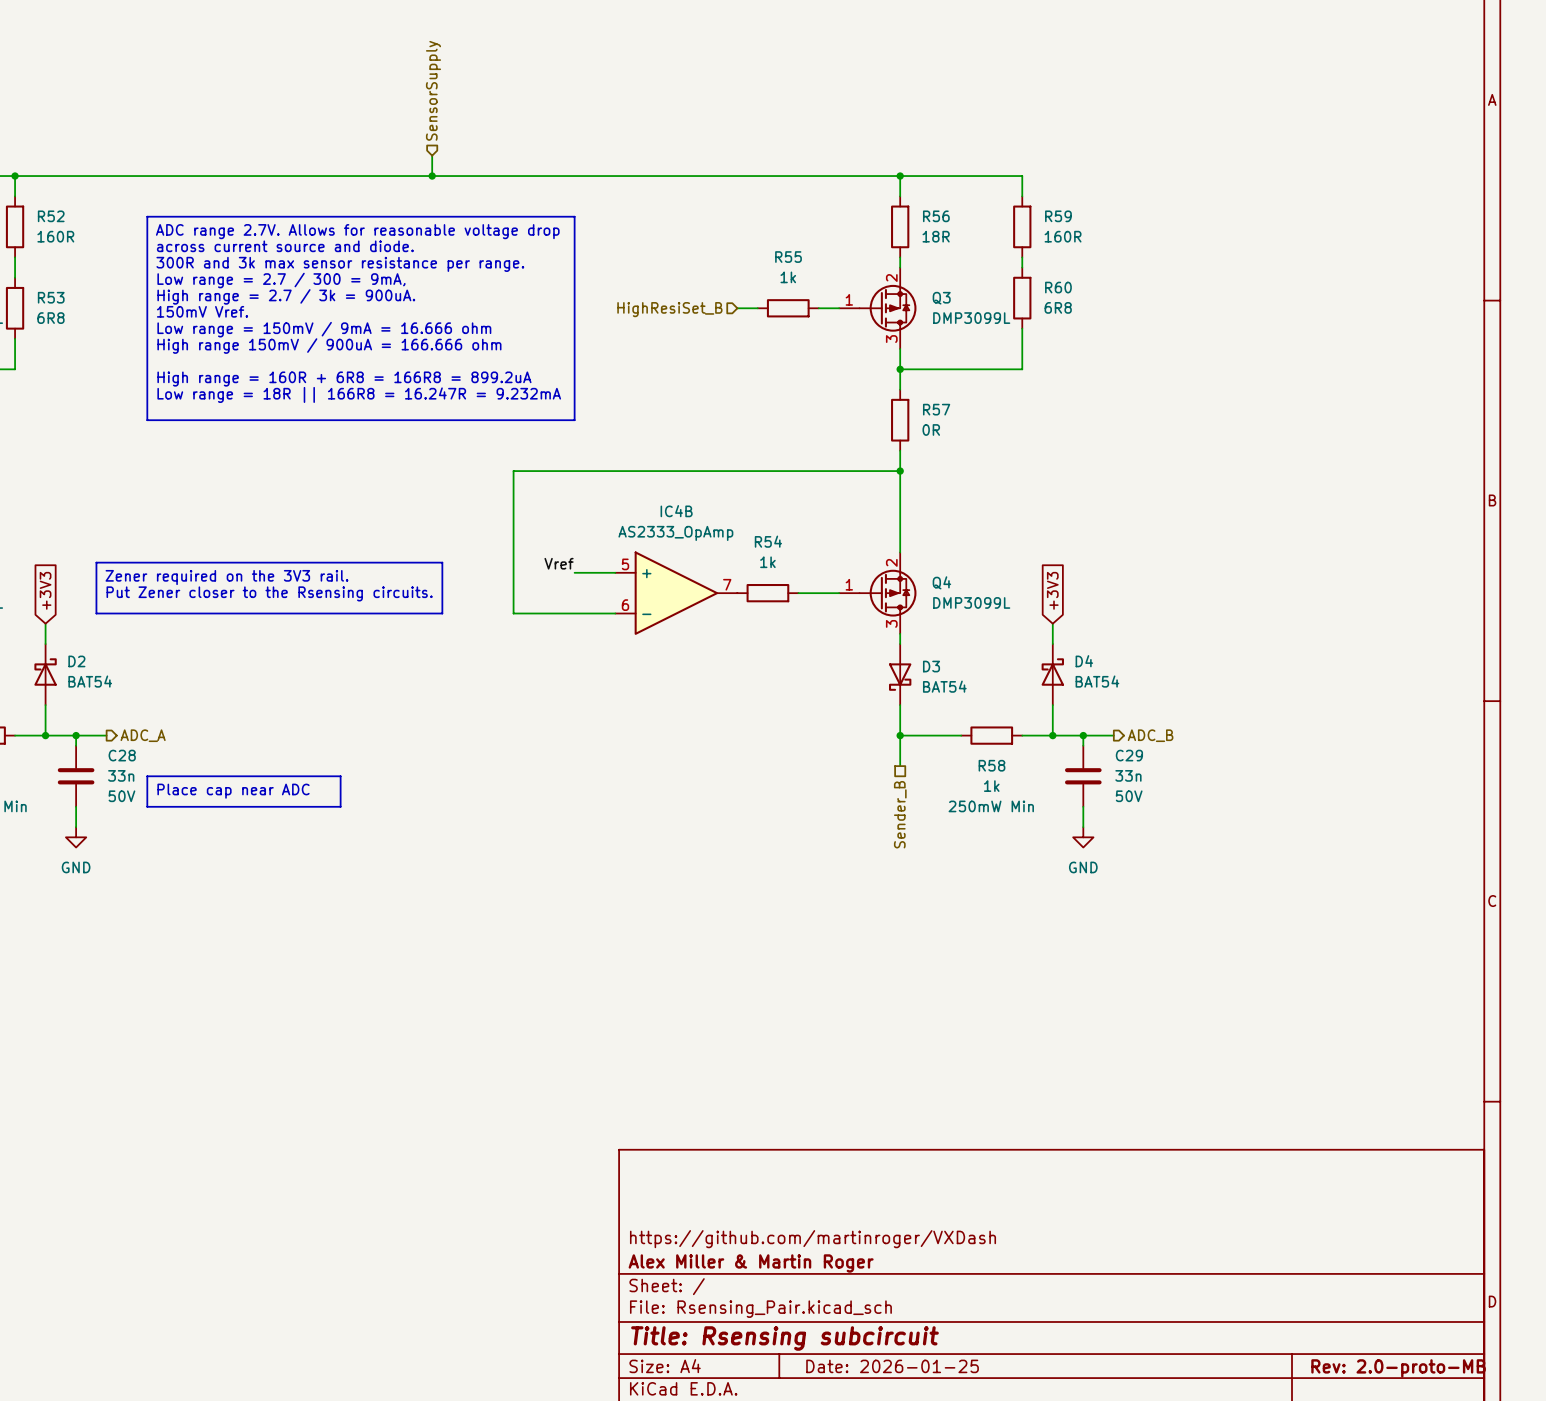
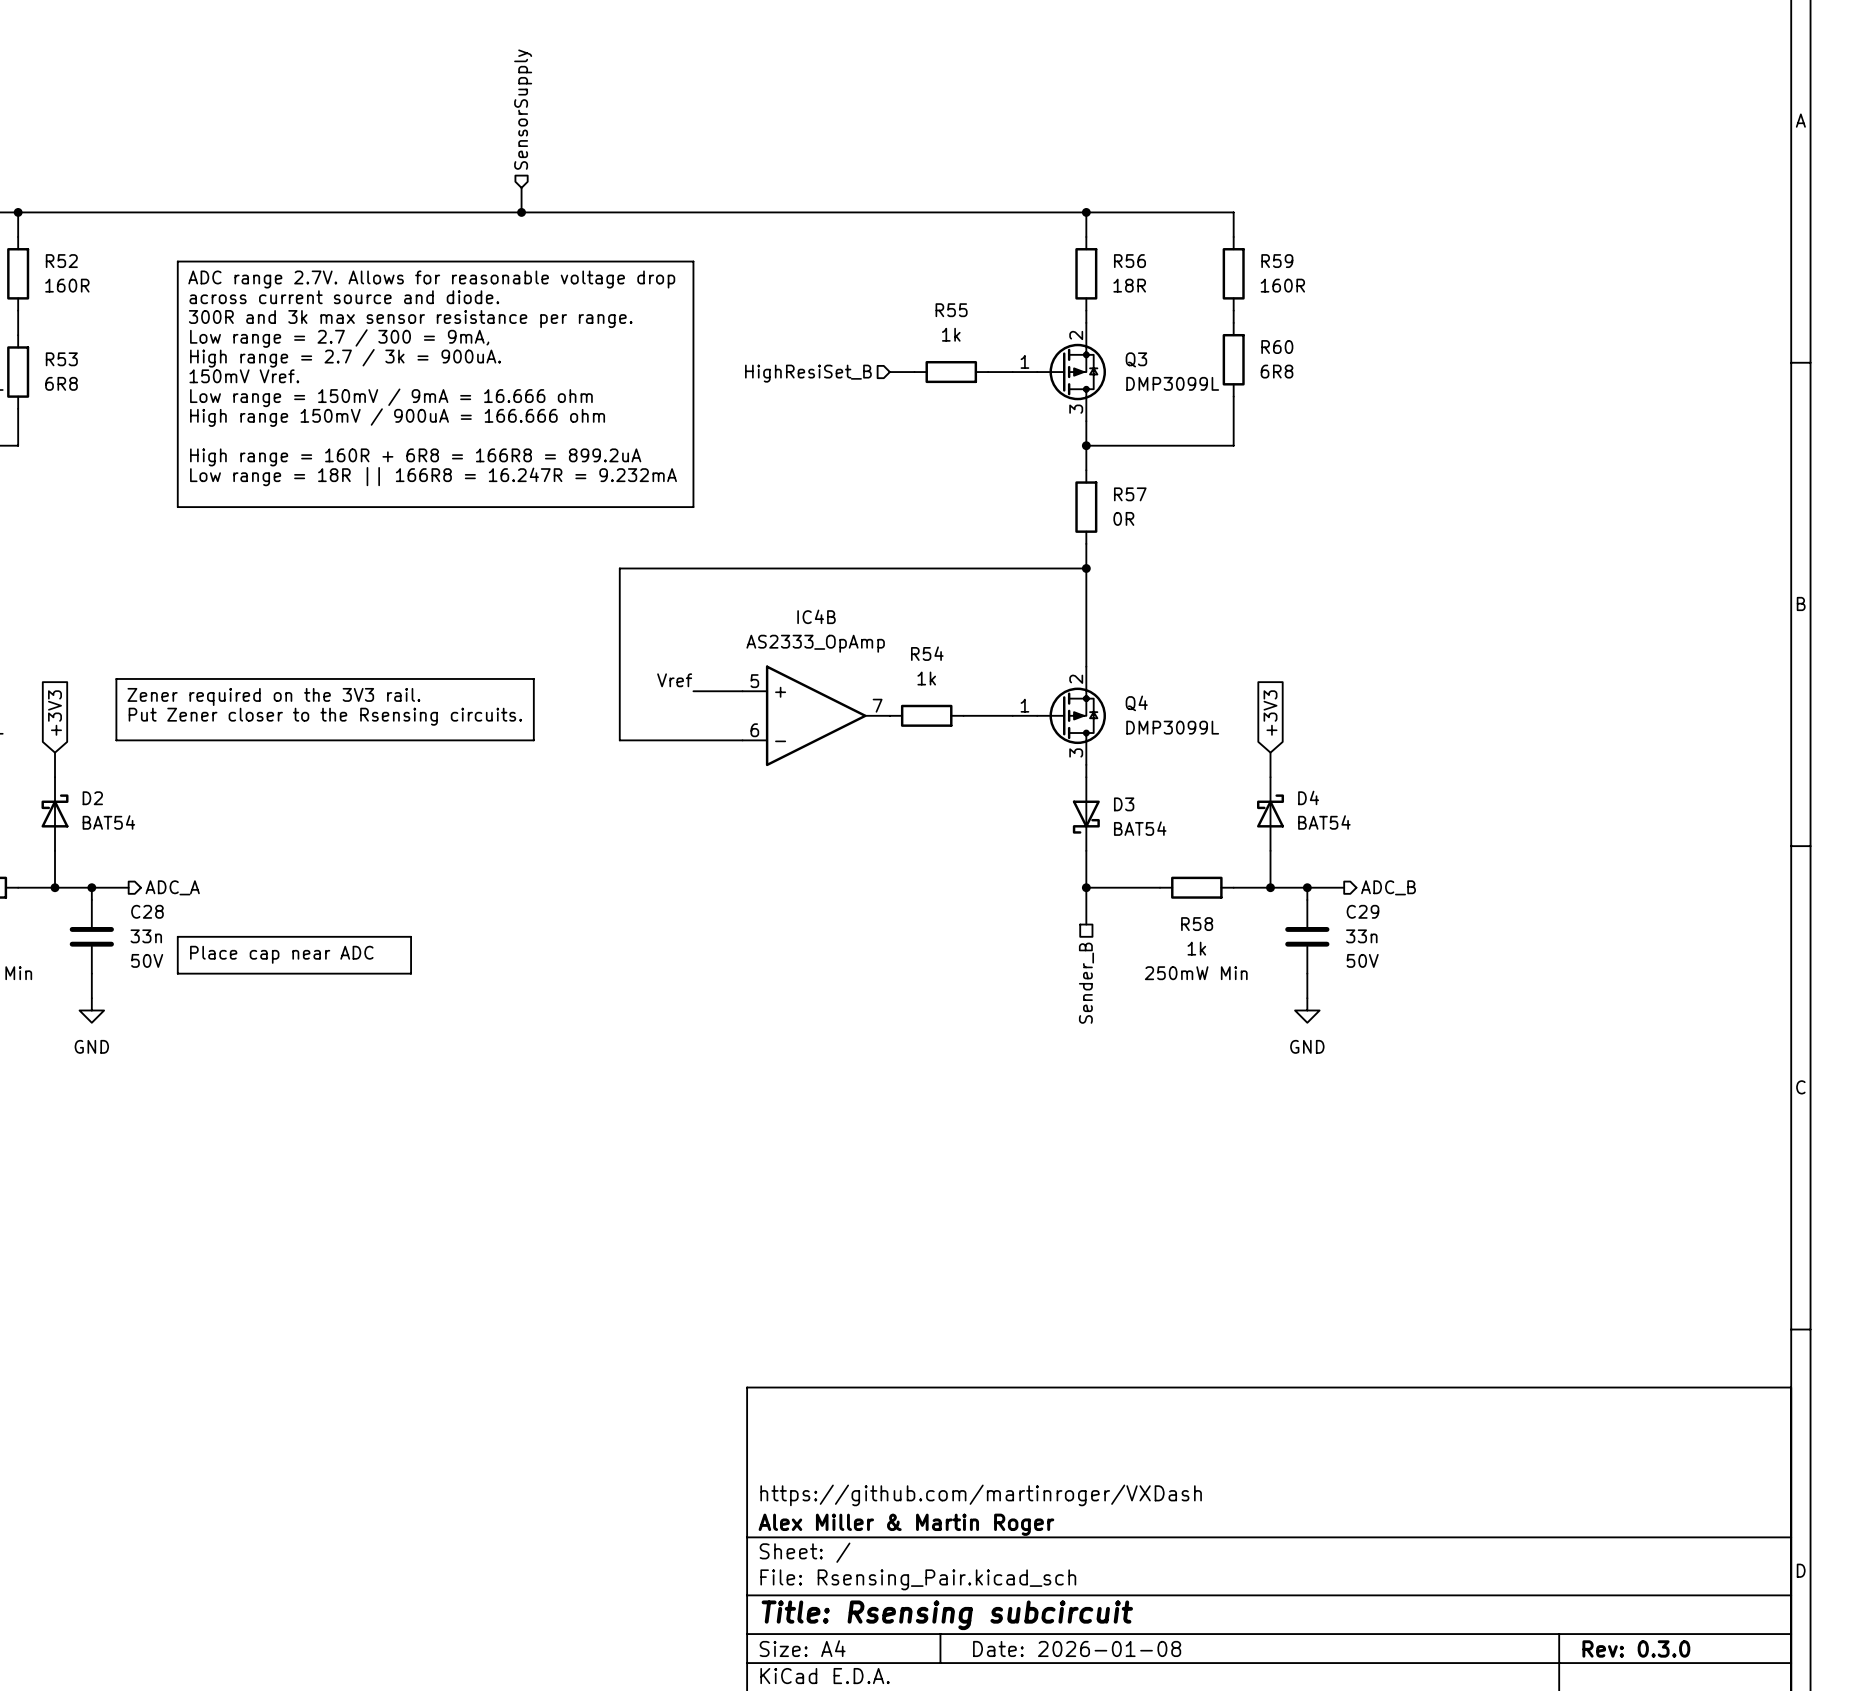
title block: Date: 2026-01-25 (892, 1366) -> Date: 2026-01-08 (1077, 1648)
title block: Rev: 2.0-proto-MB (1398, 1368) -> Rev: 0.3.0 (1636, 1648)

